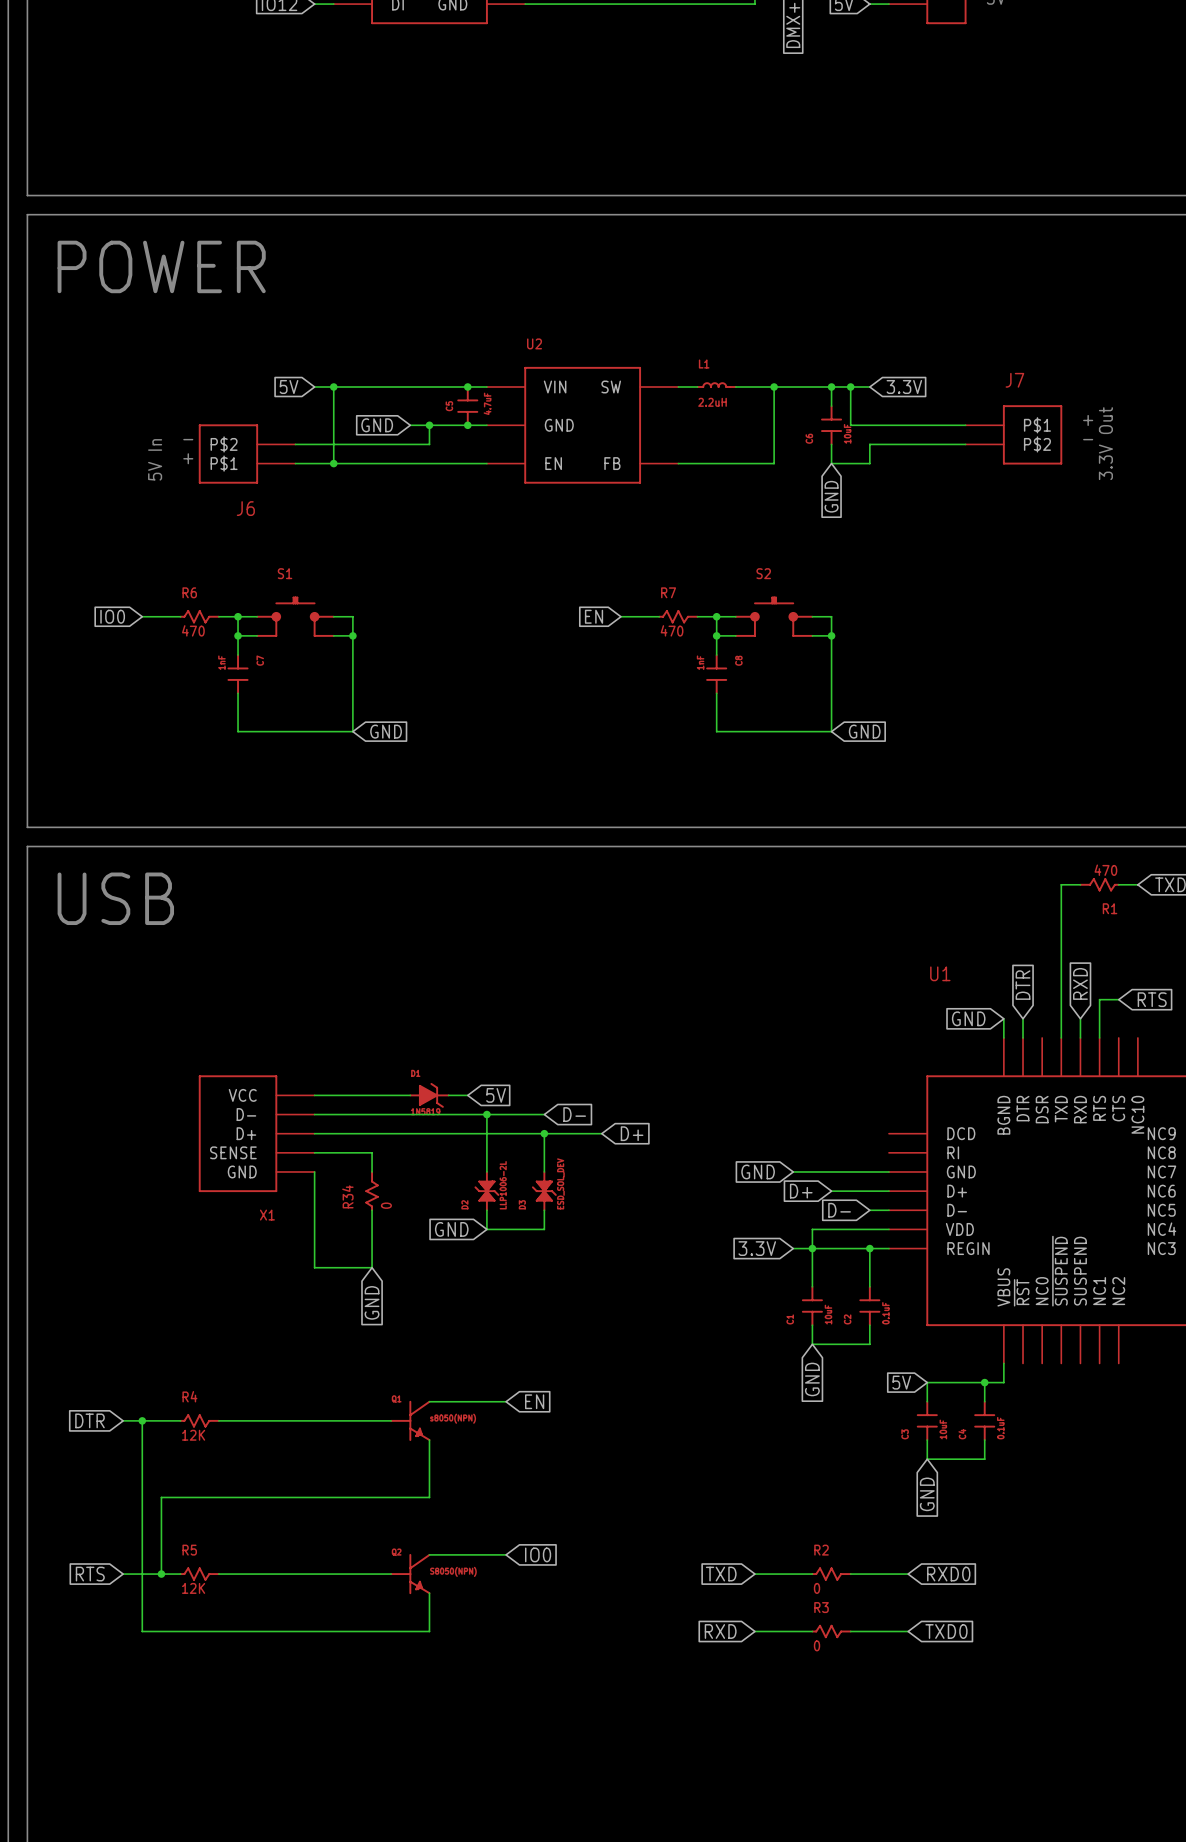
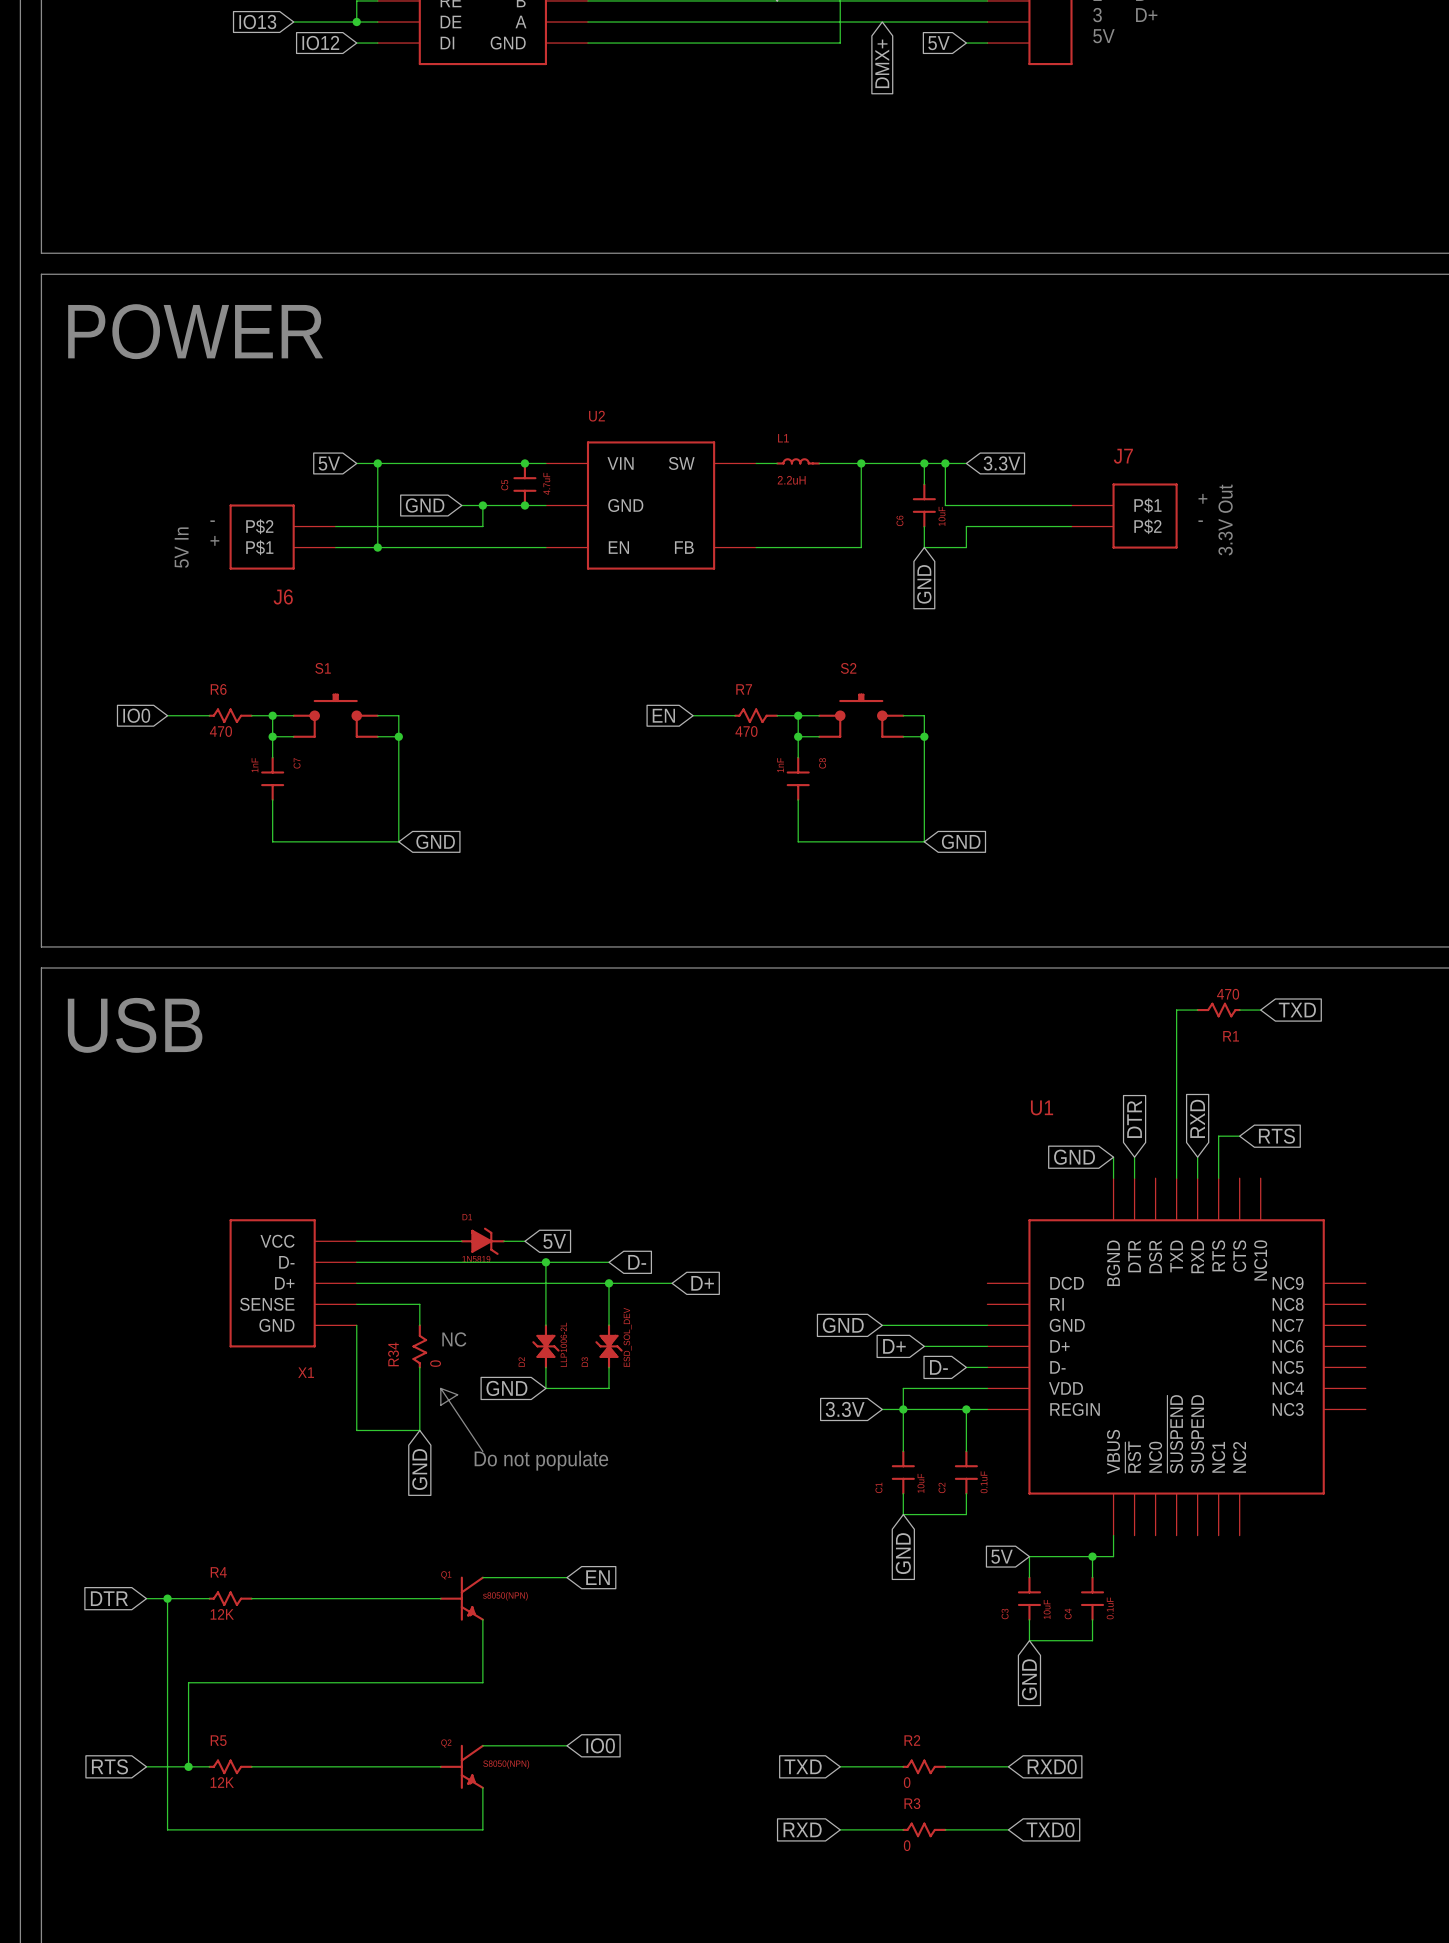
text: none -> NC (454, 1339)
line: none -> (440, 1388) (482, 1451)
line: none -> (440, 1388) (440, 1405) (457, 1394) (440, 1388)
text: none -> Do not populate (541, 1460)

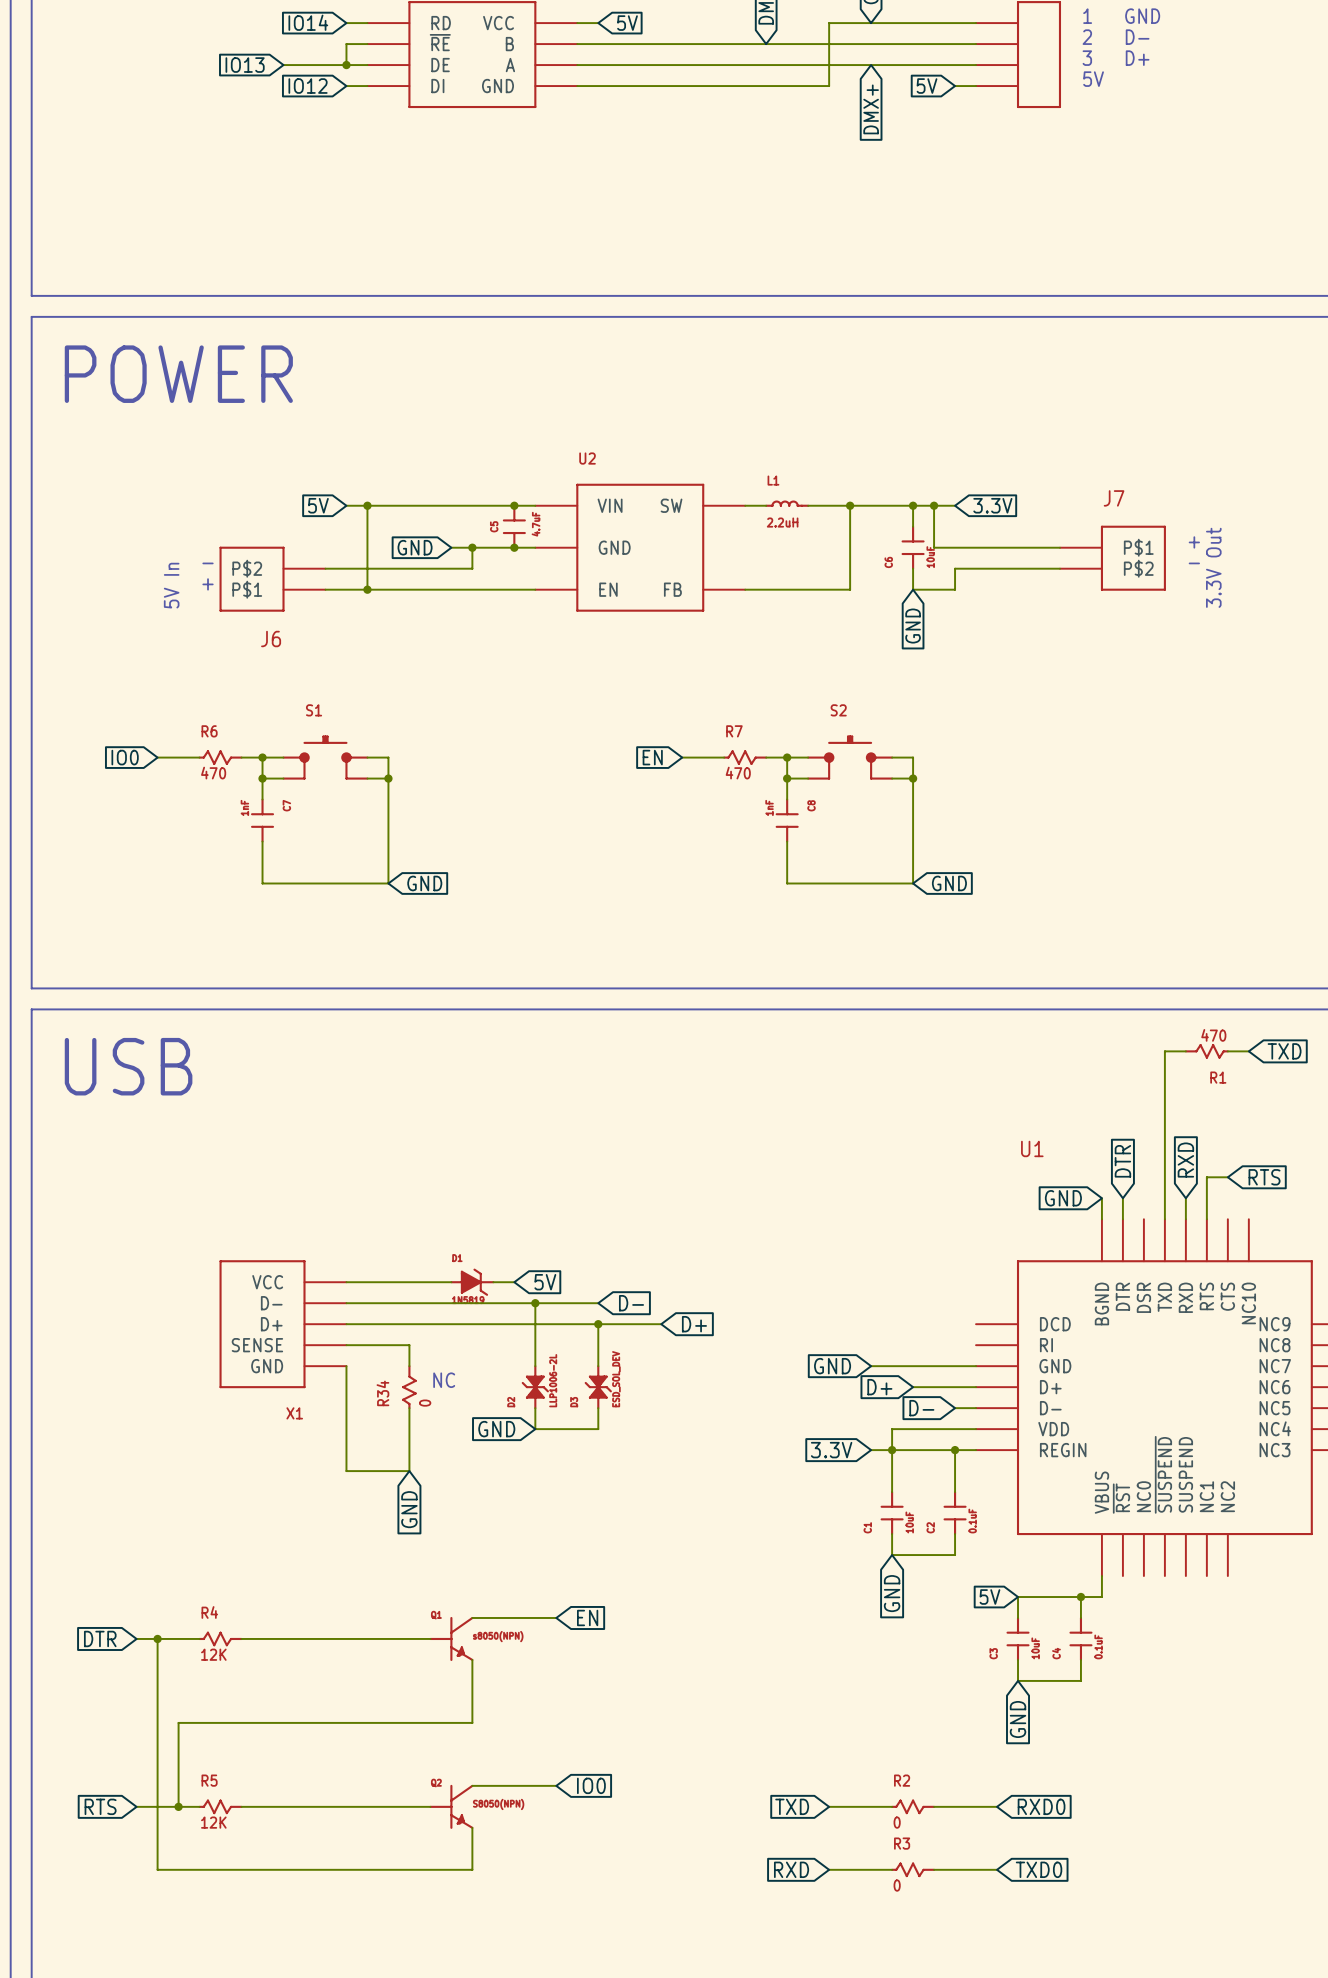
line: (440, 1388) (482, 1451) -> none
line: (440, 1388) (440, 1405) (457, 1394) (440, 1388) -> none
text: Do not populate (541, 1460) -> none

